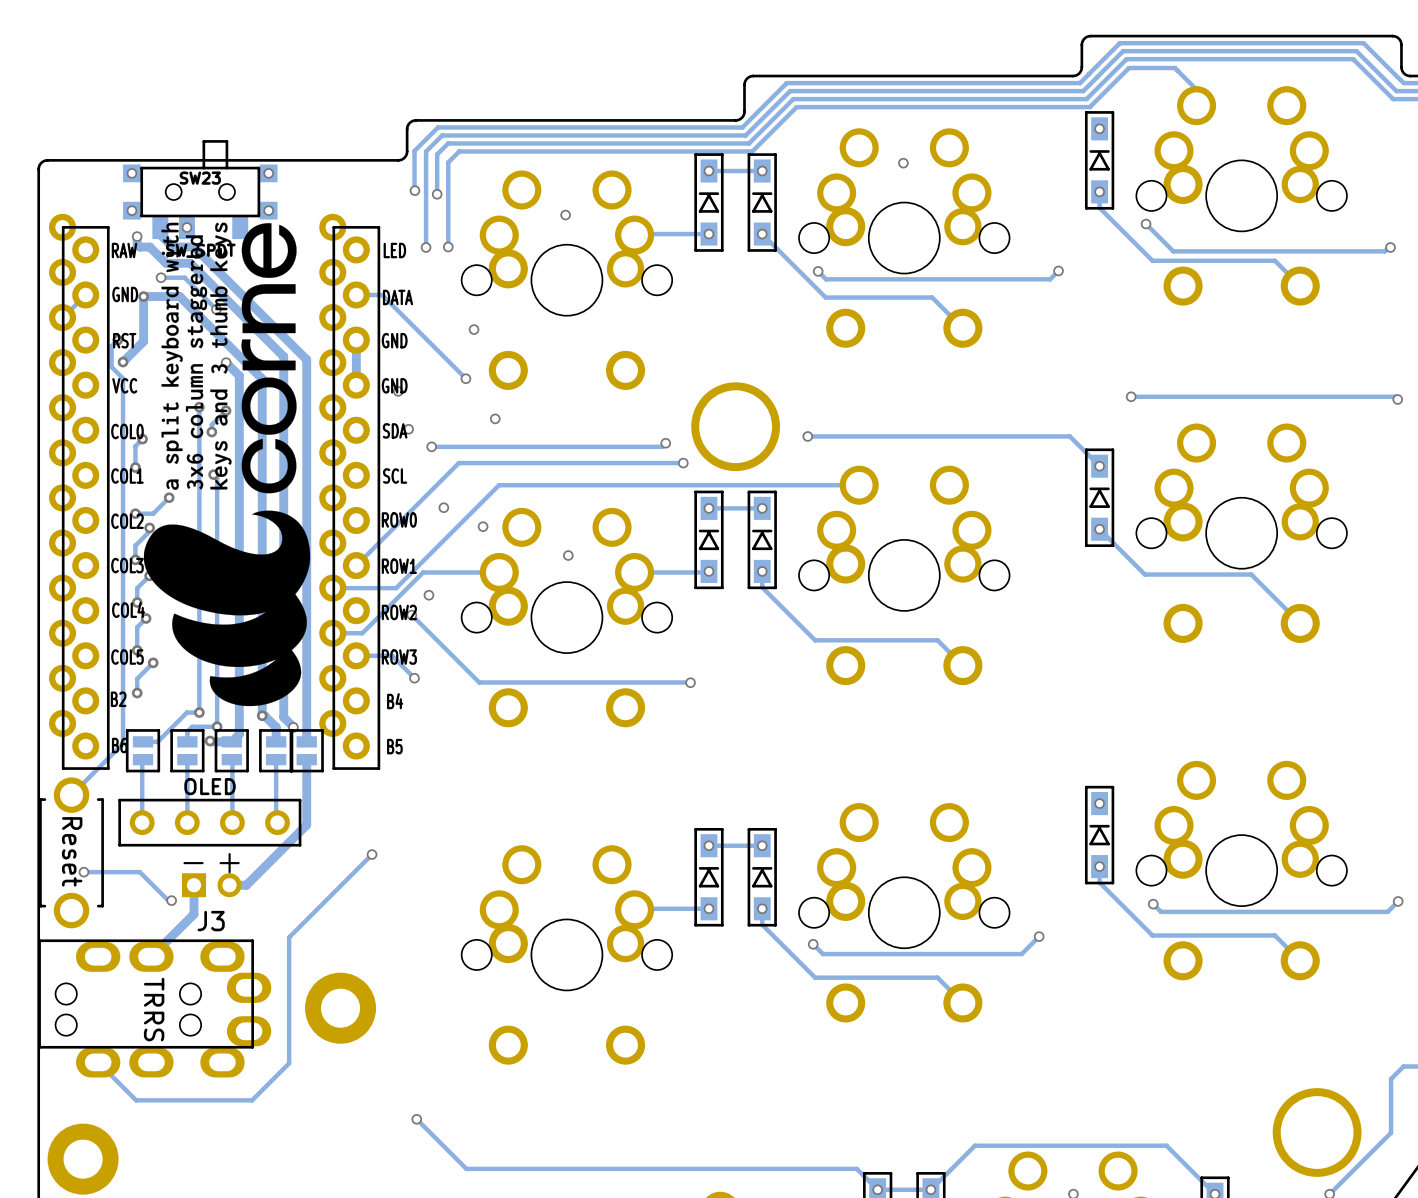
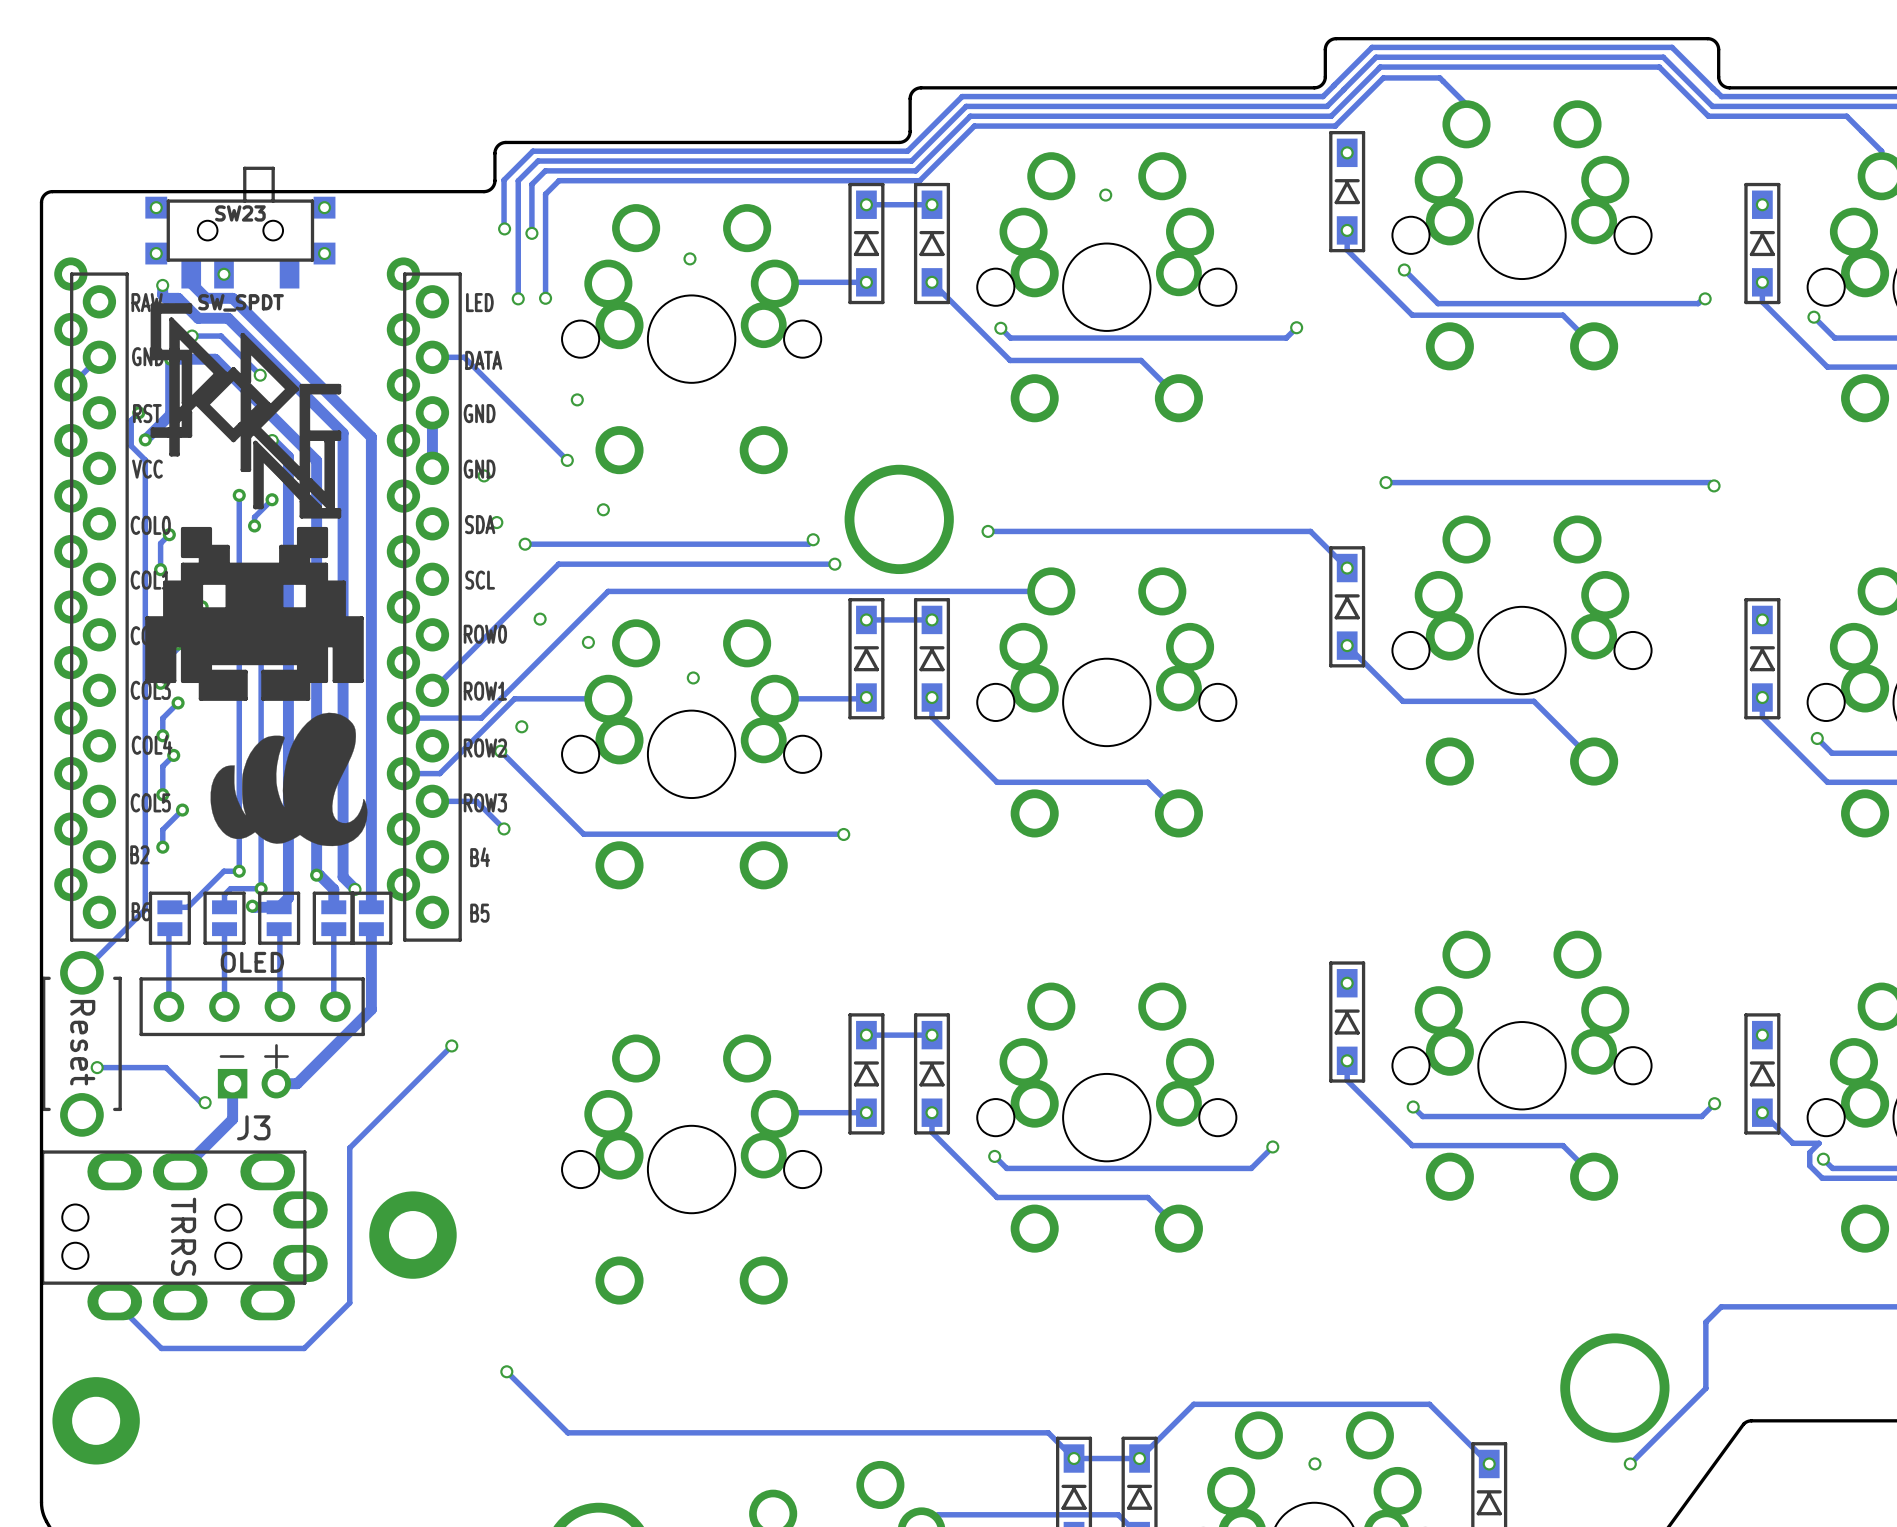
drawing: [143, 222, 311, 707] -> none
drawing: none -> [150, 303, 342, 519]
part: none -> (254, 613)
drawing: none -> [210, 712, 368, 847]

